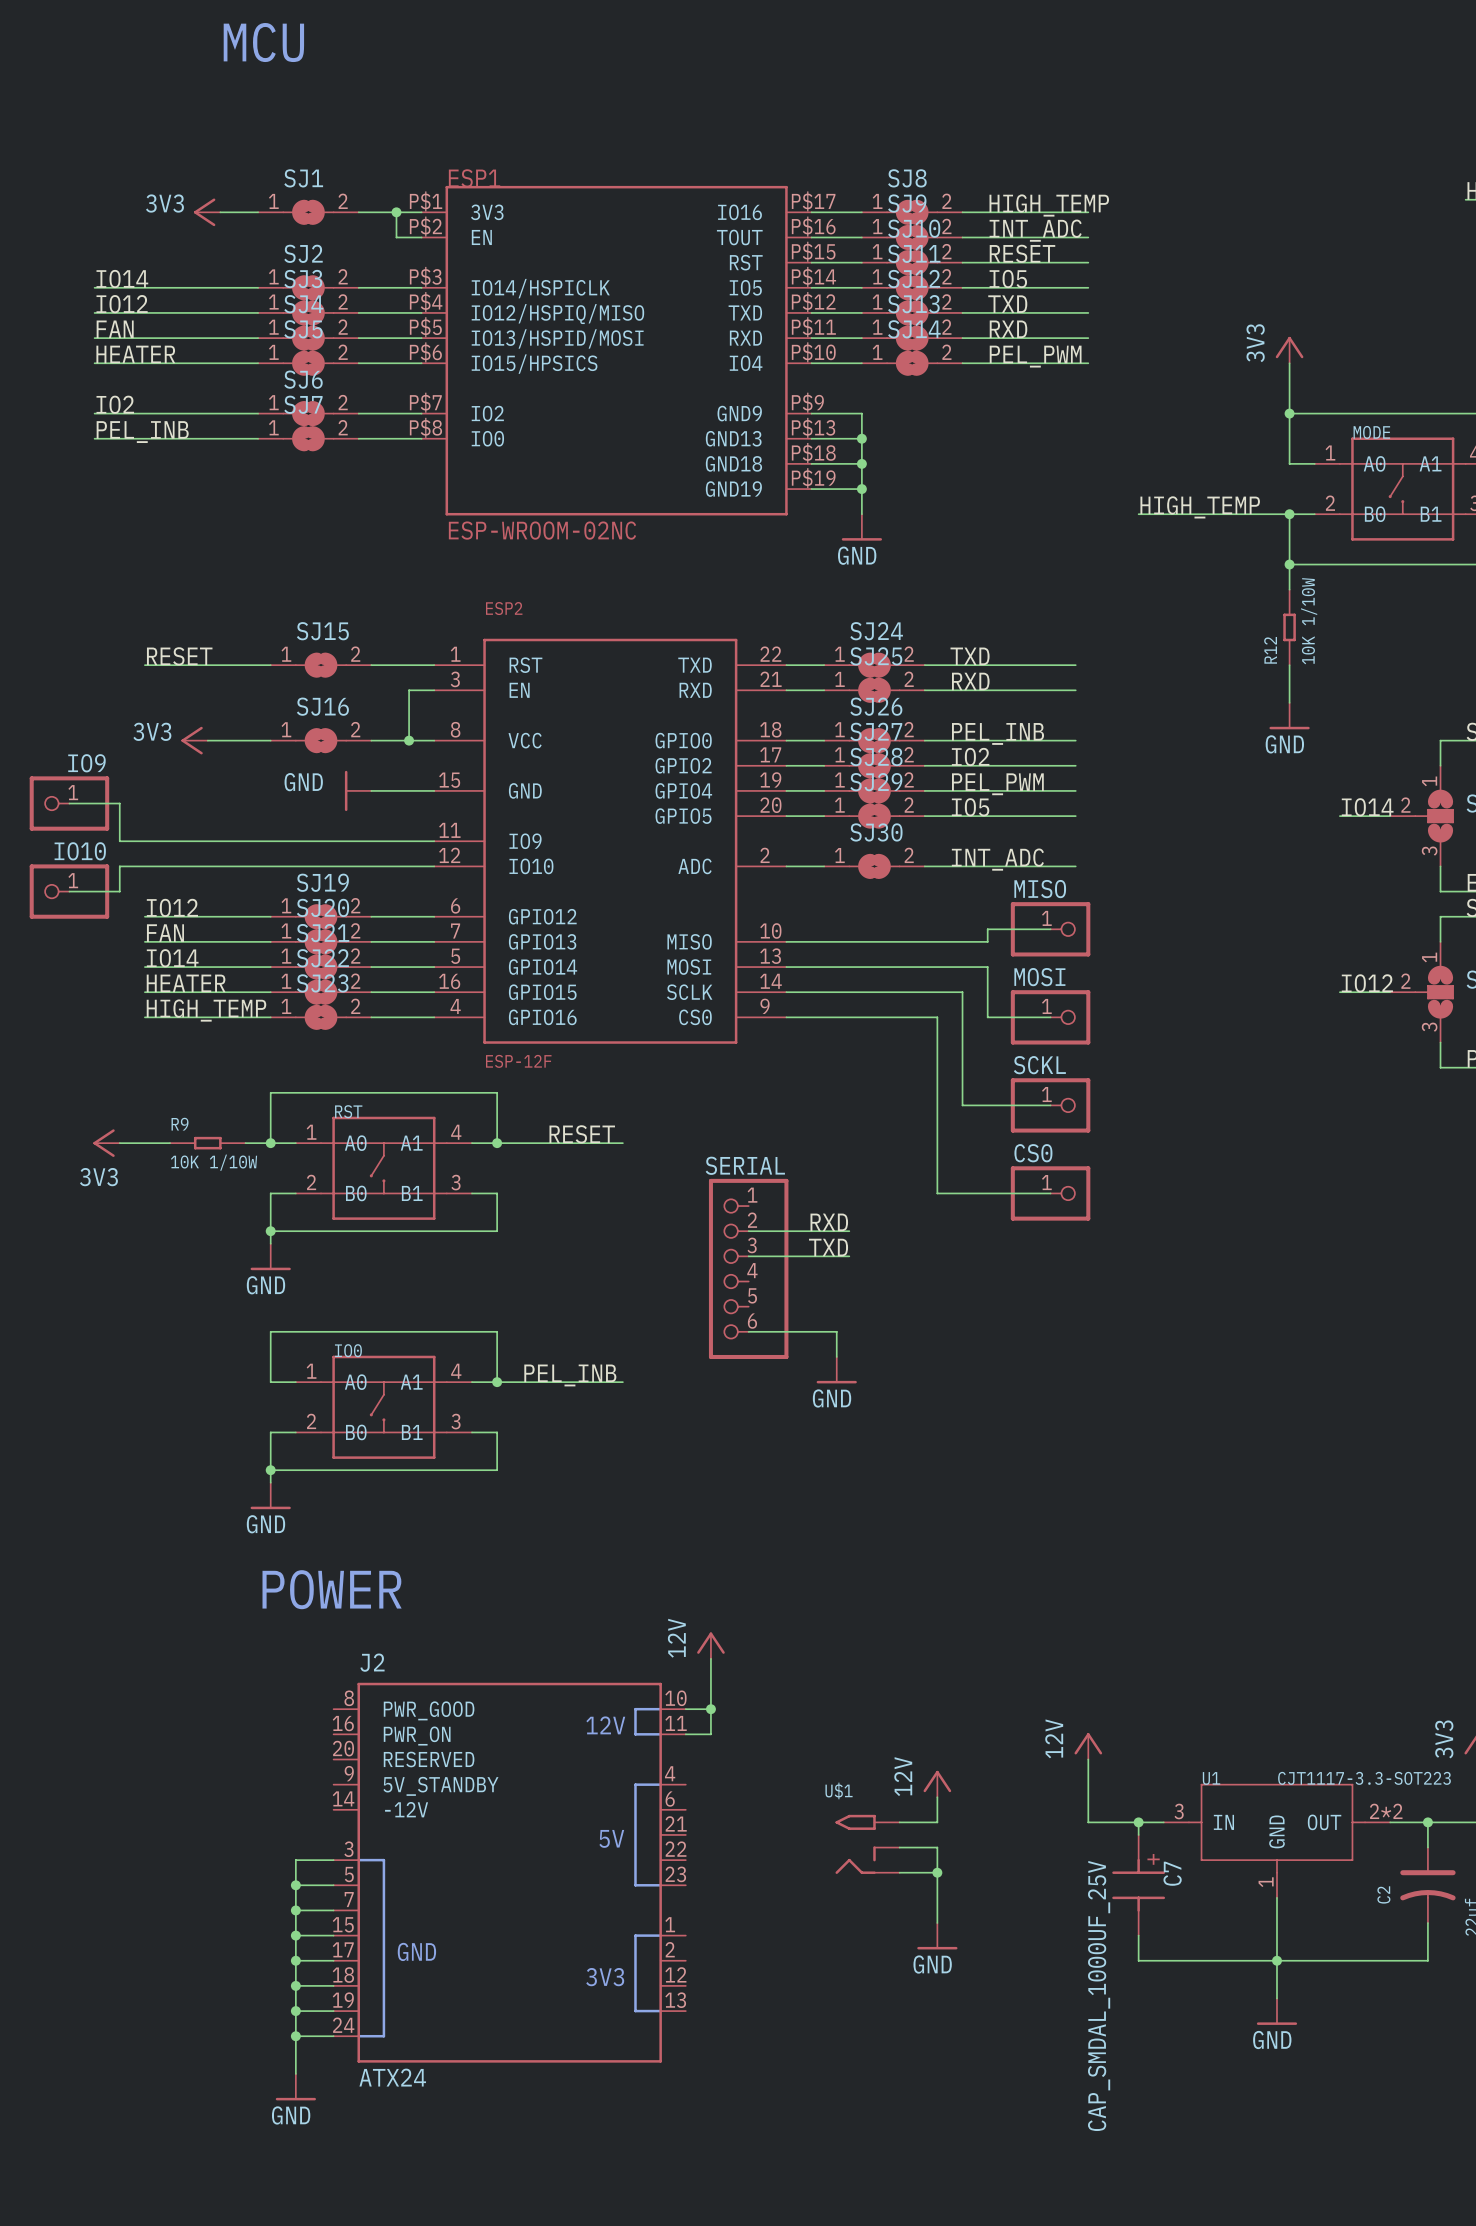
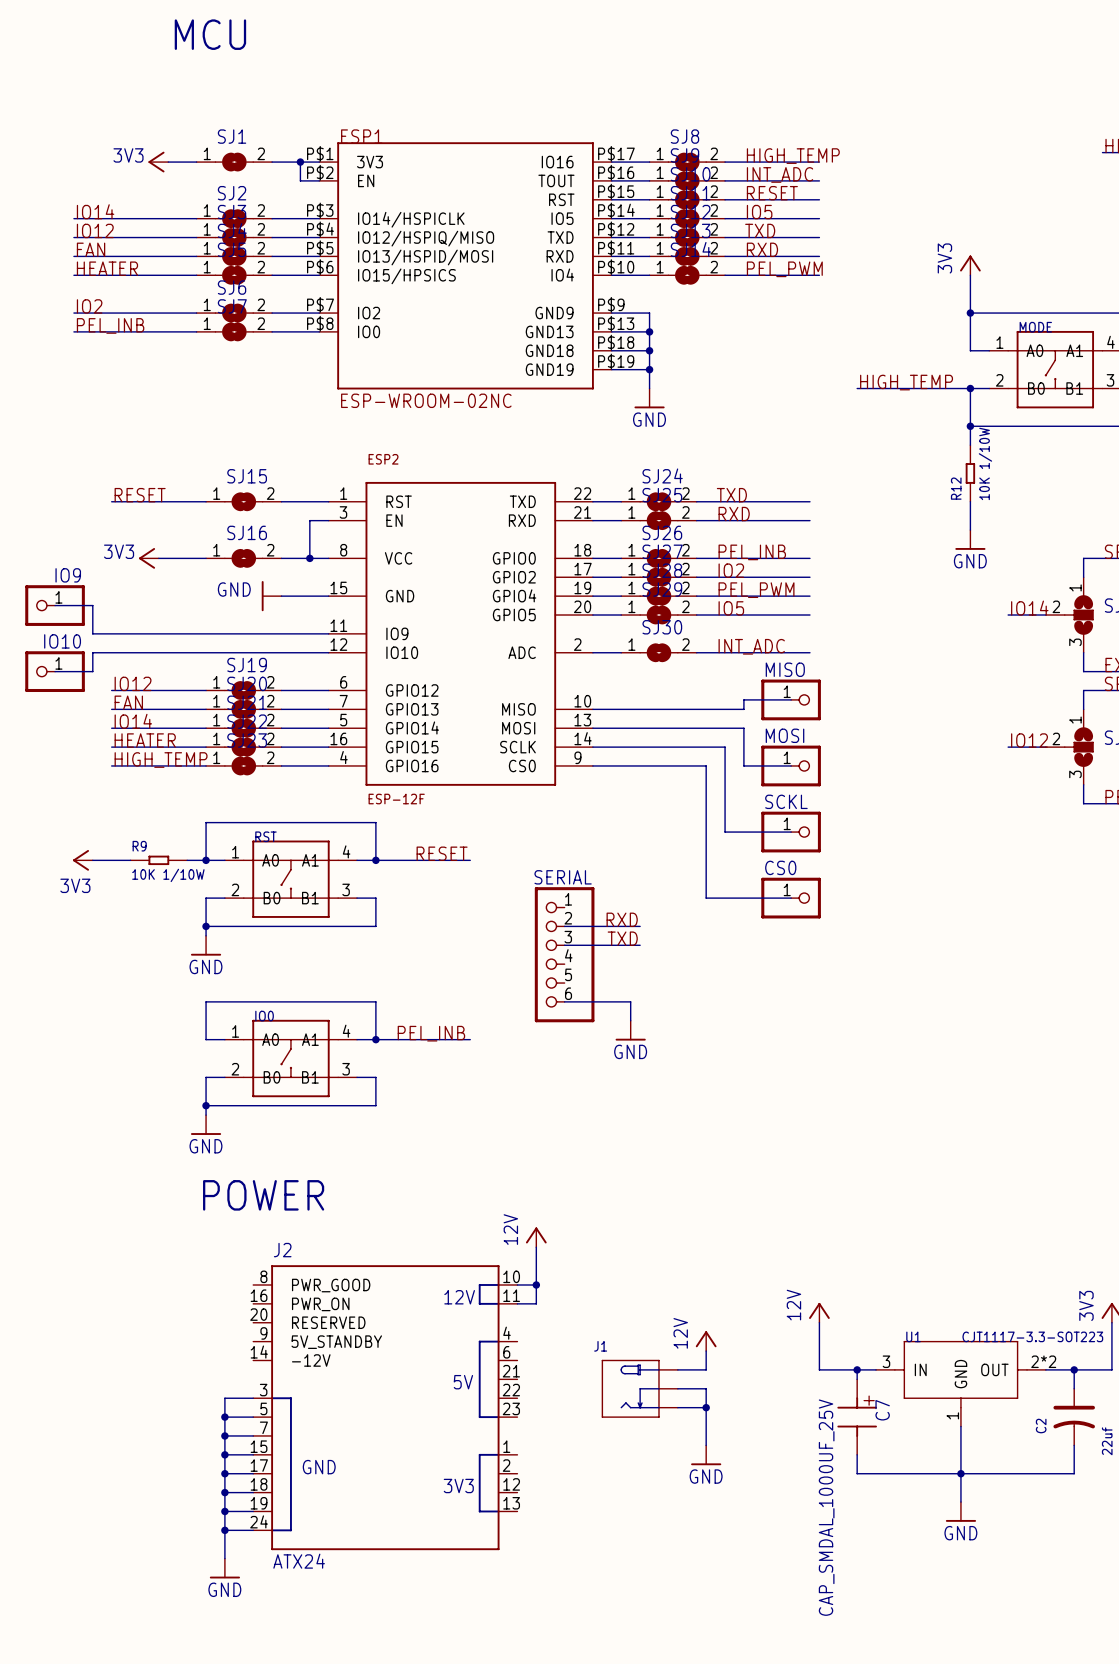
U$1: (867, 1844) -> none
J1: none -> (639, 1388)

